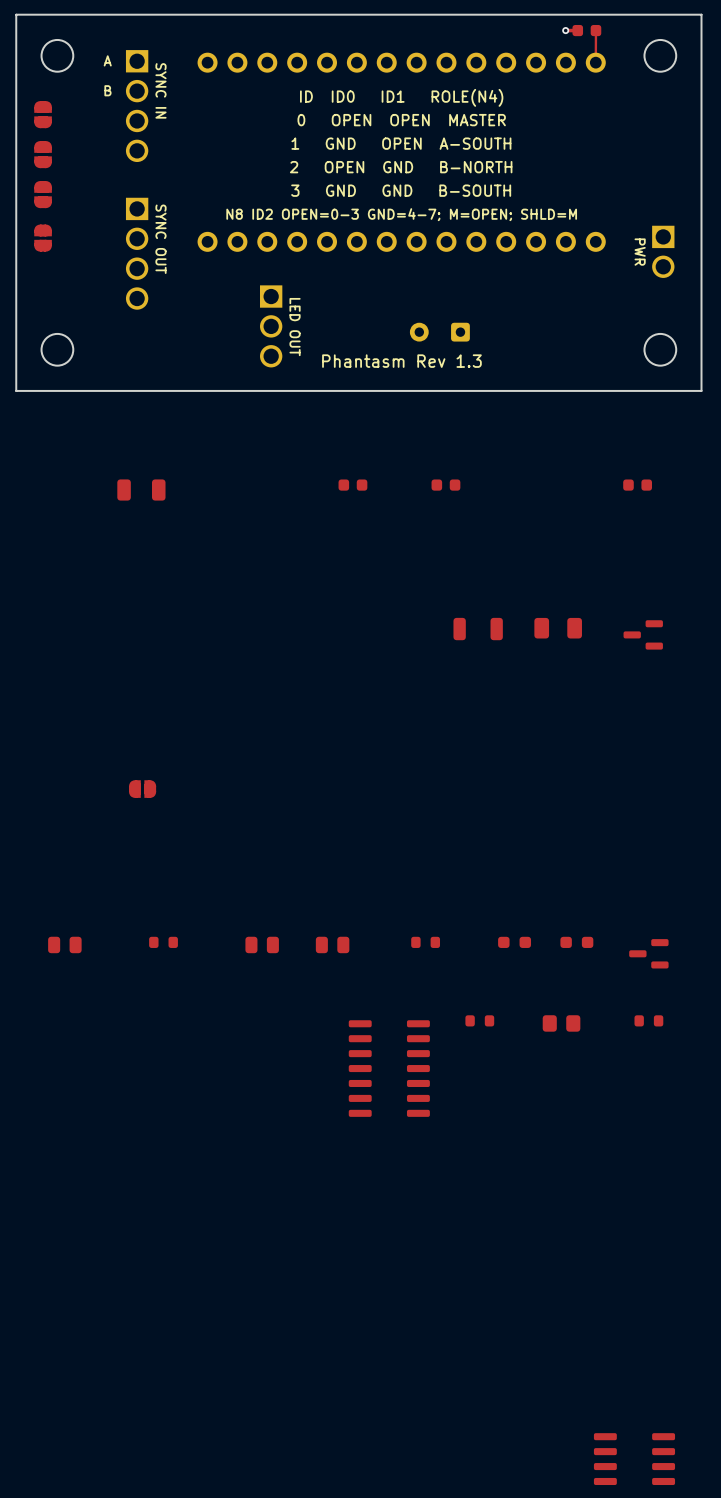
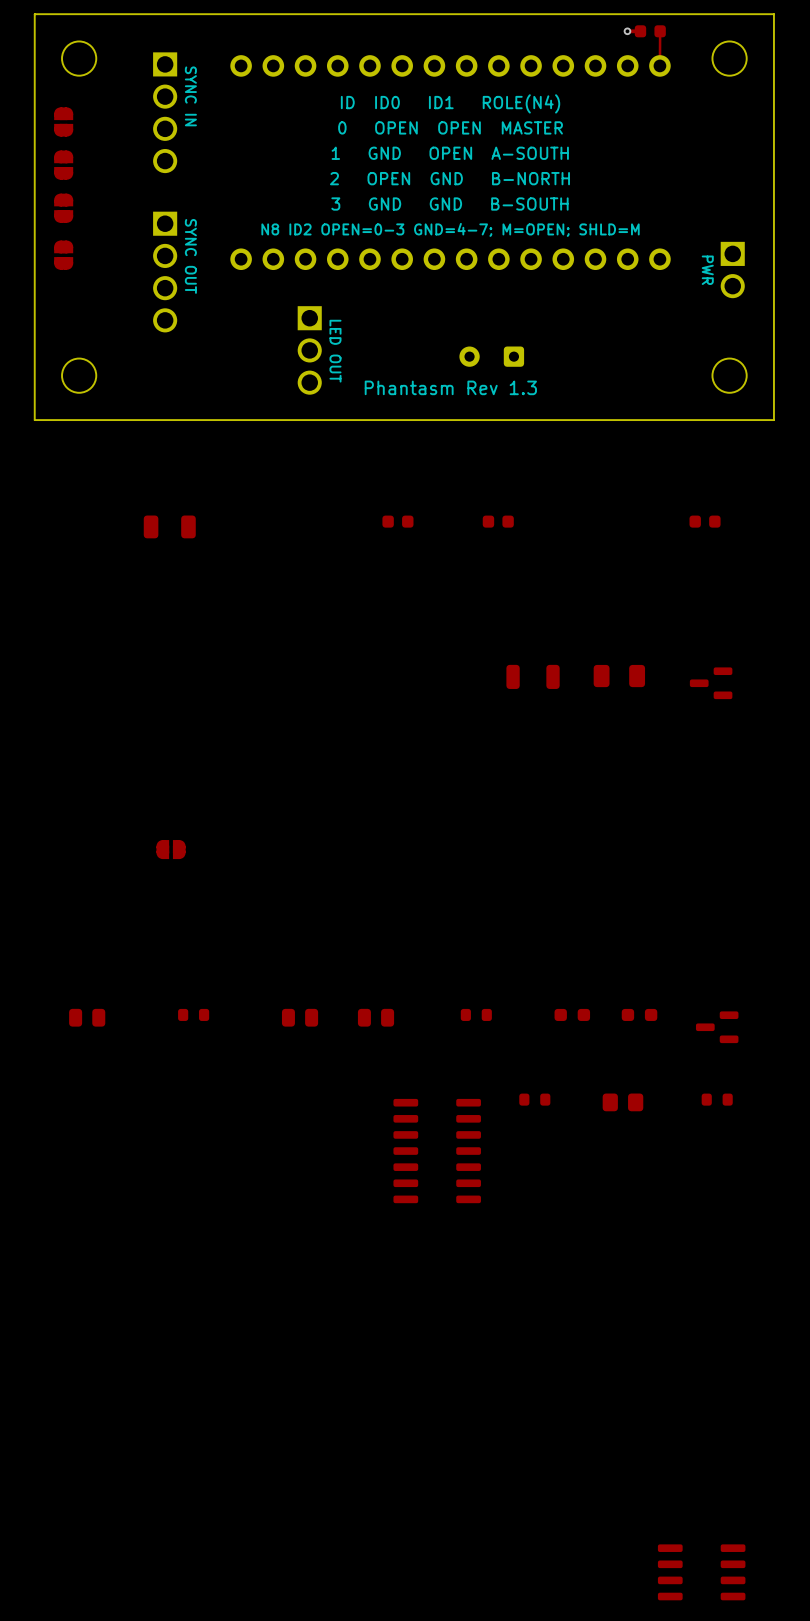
text: A (107, 60) -> none
text: B (107, 90) -> none

